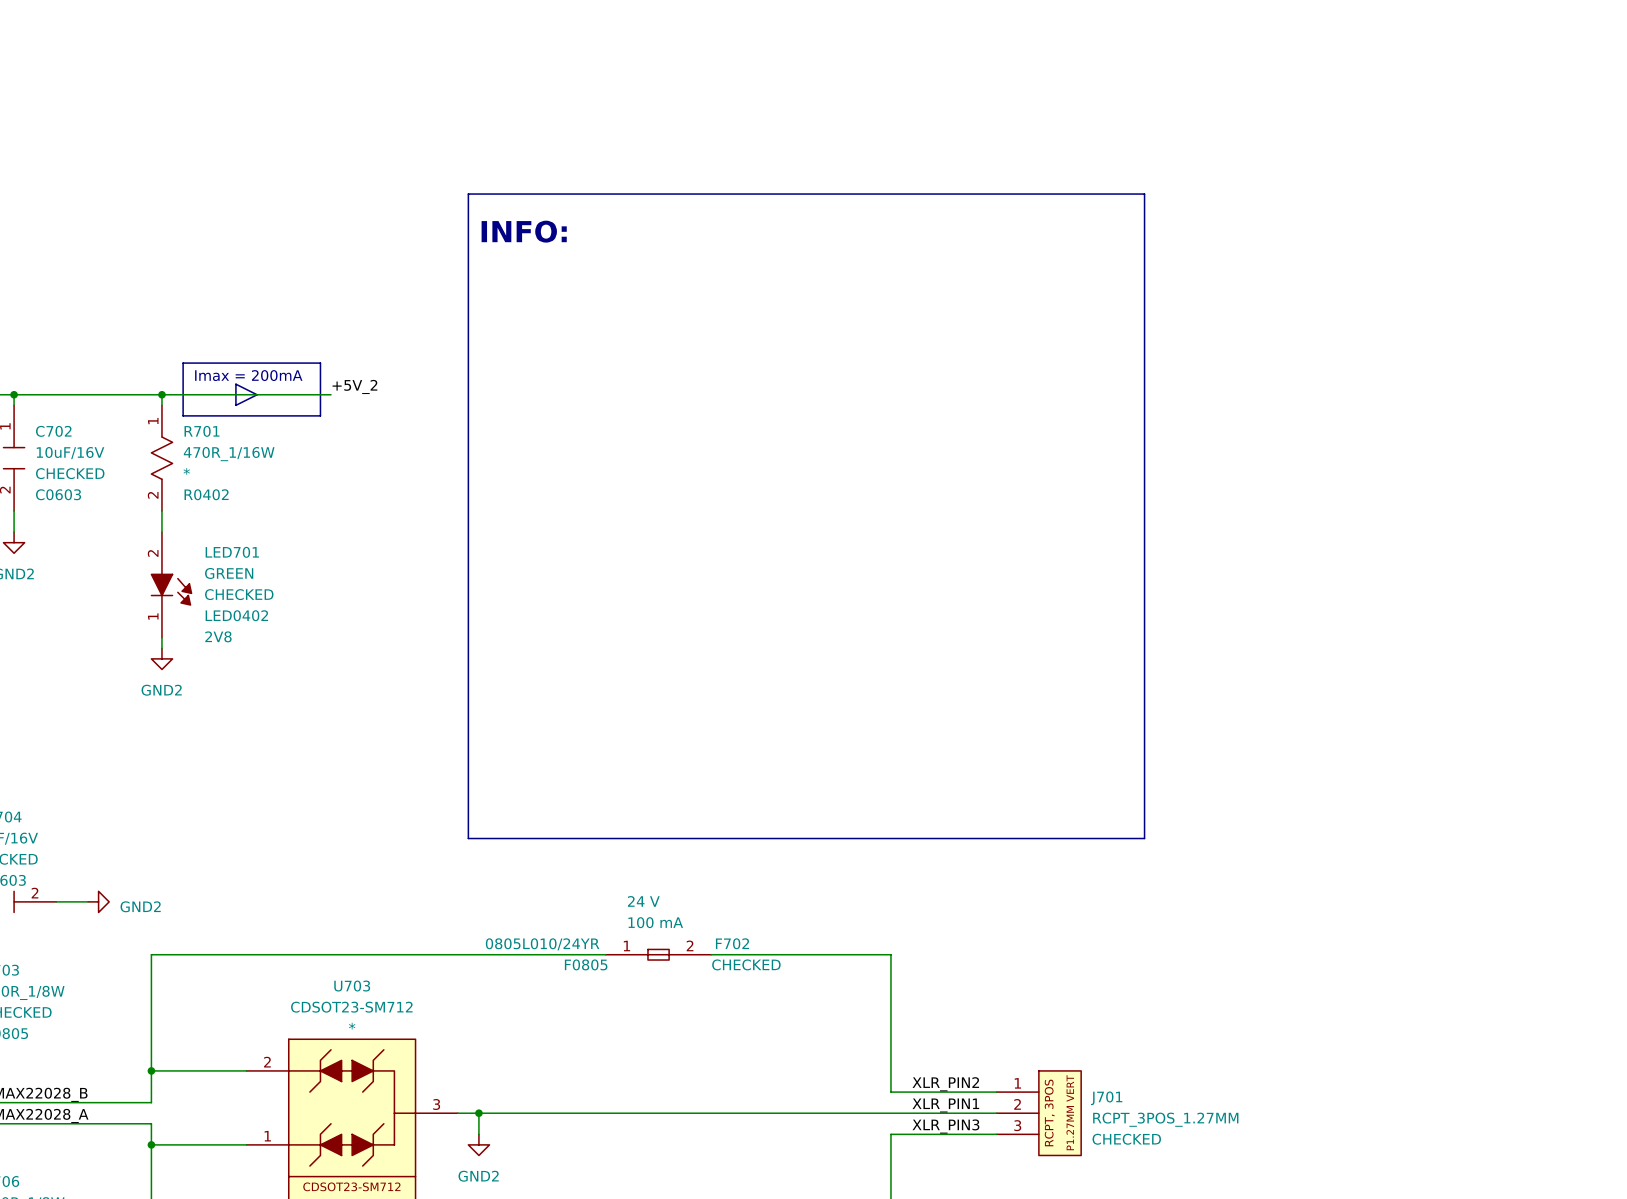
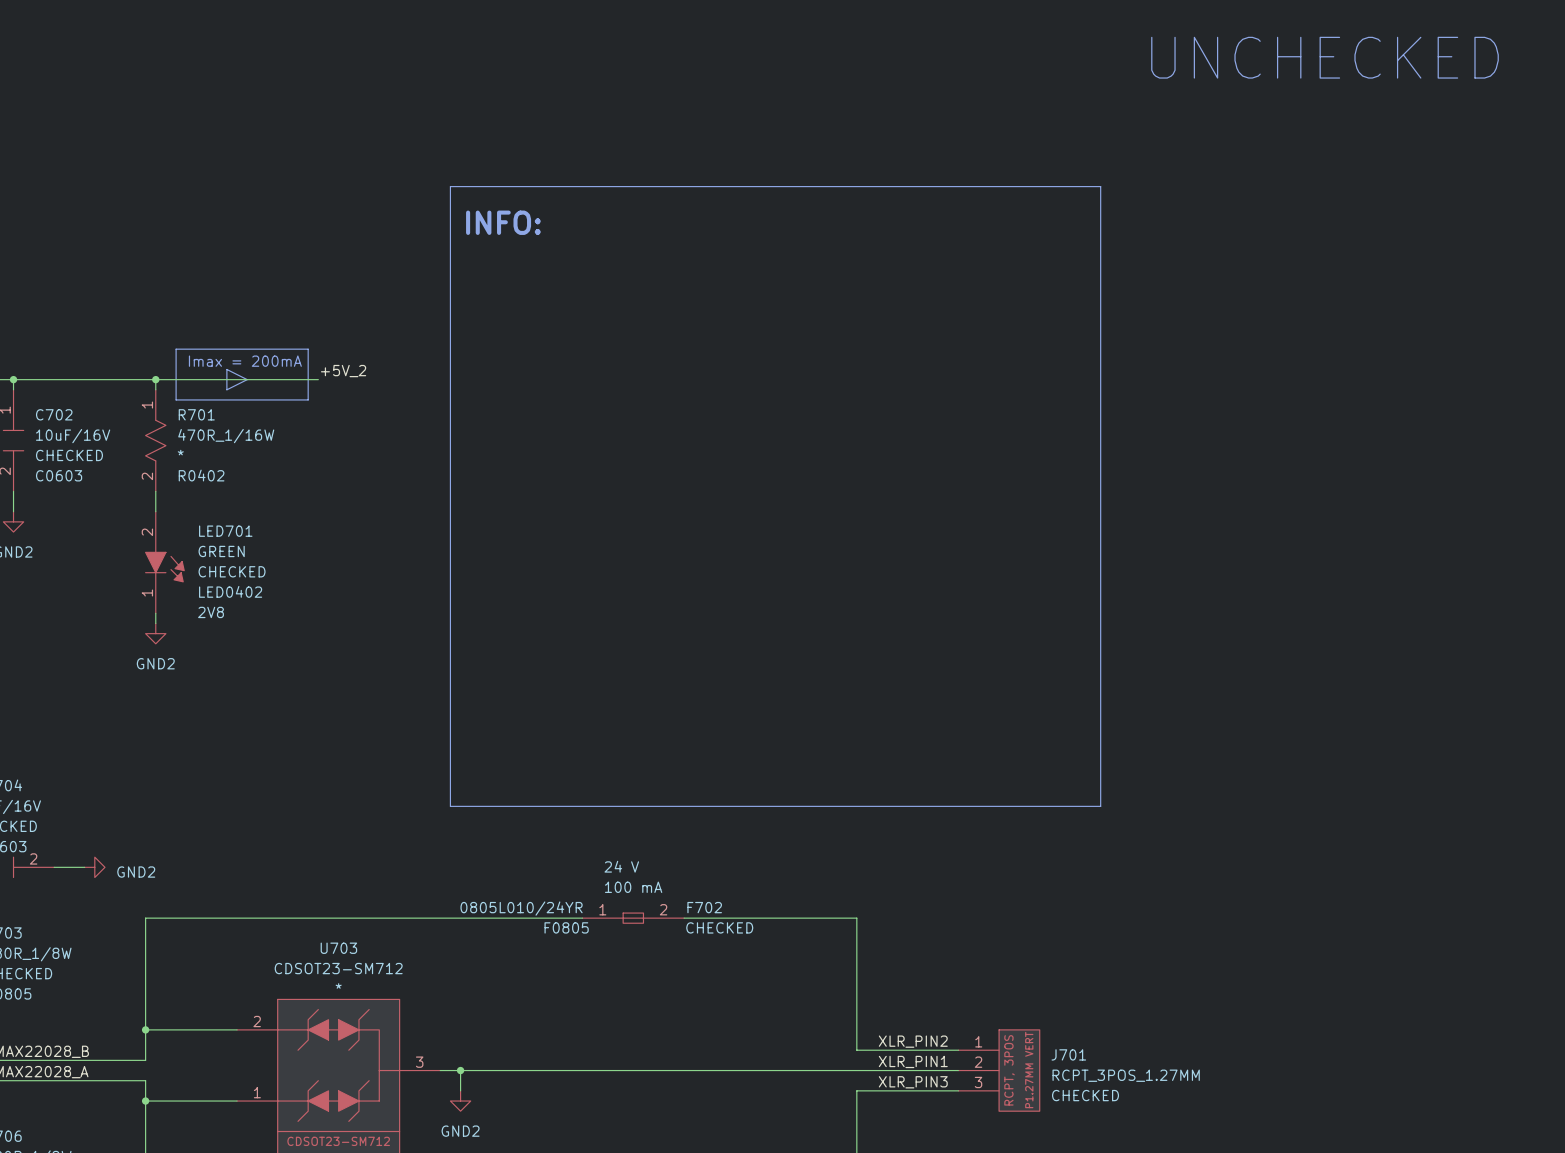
text: none -> UNCHECKED (1325, 57)

